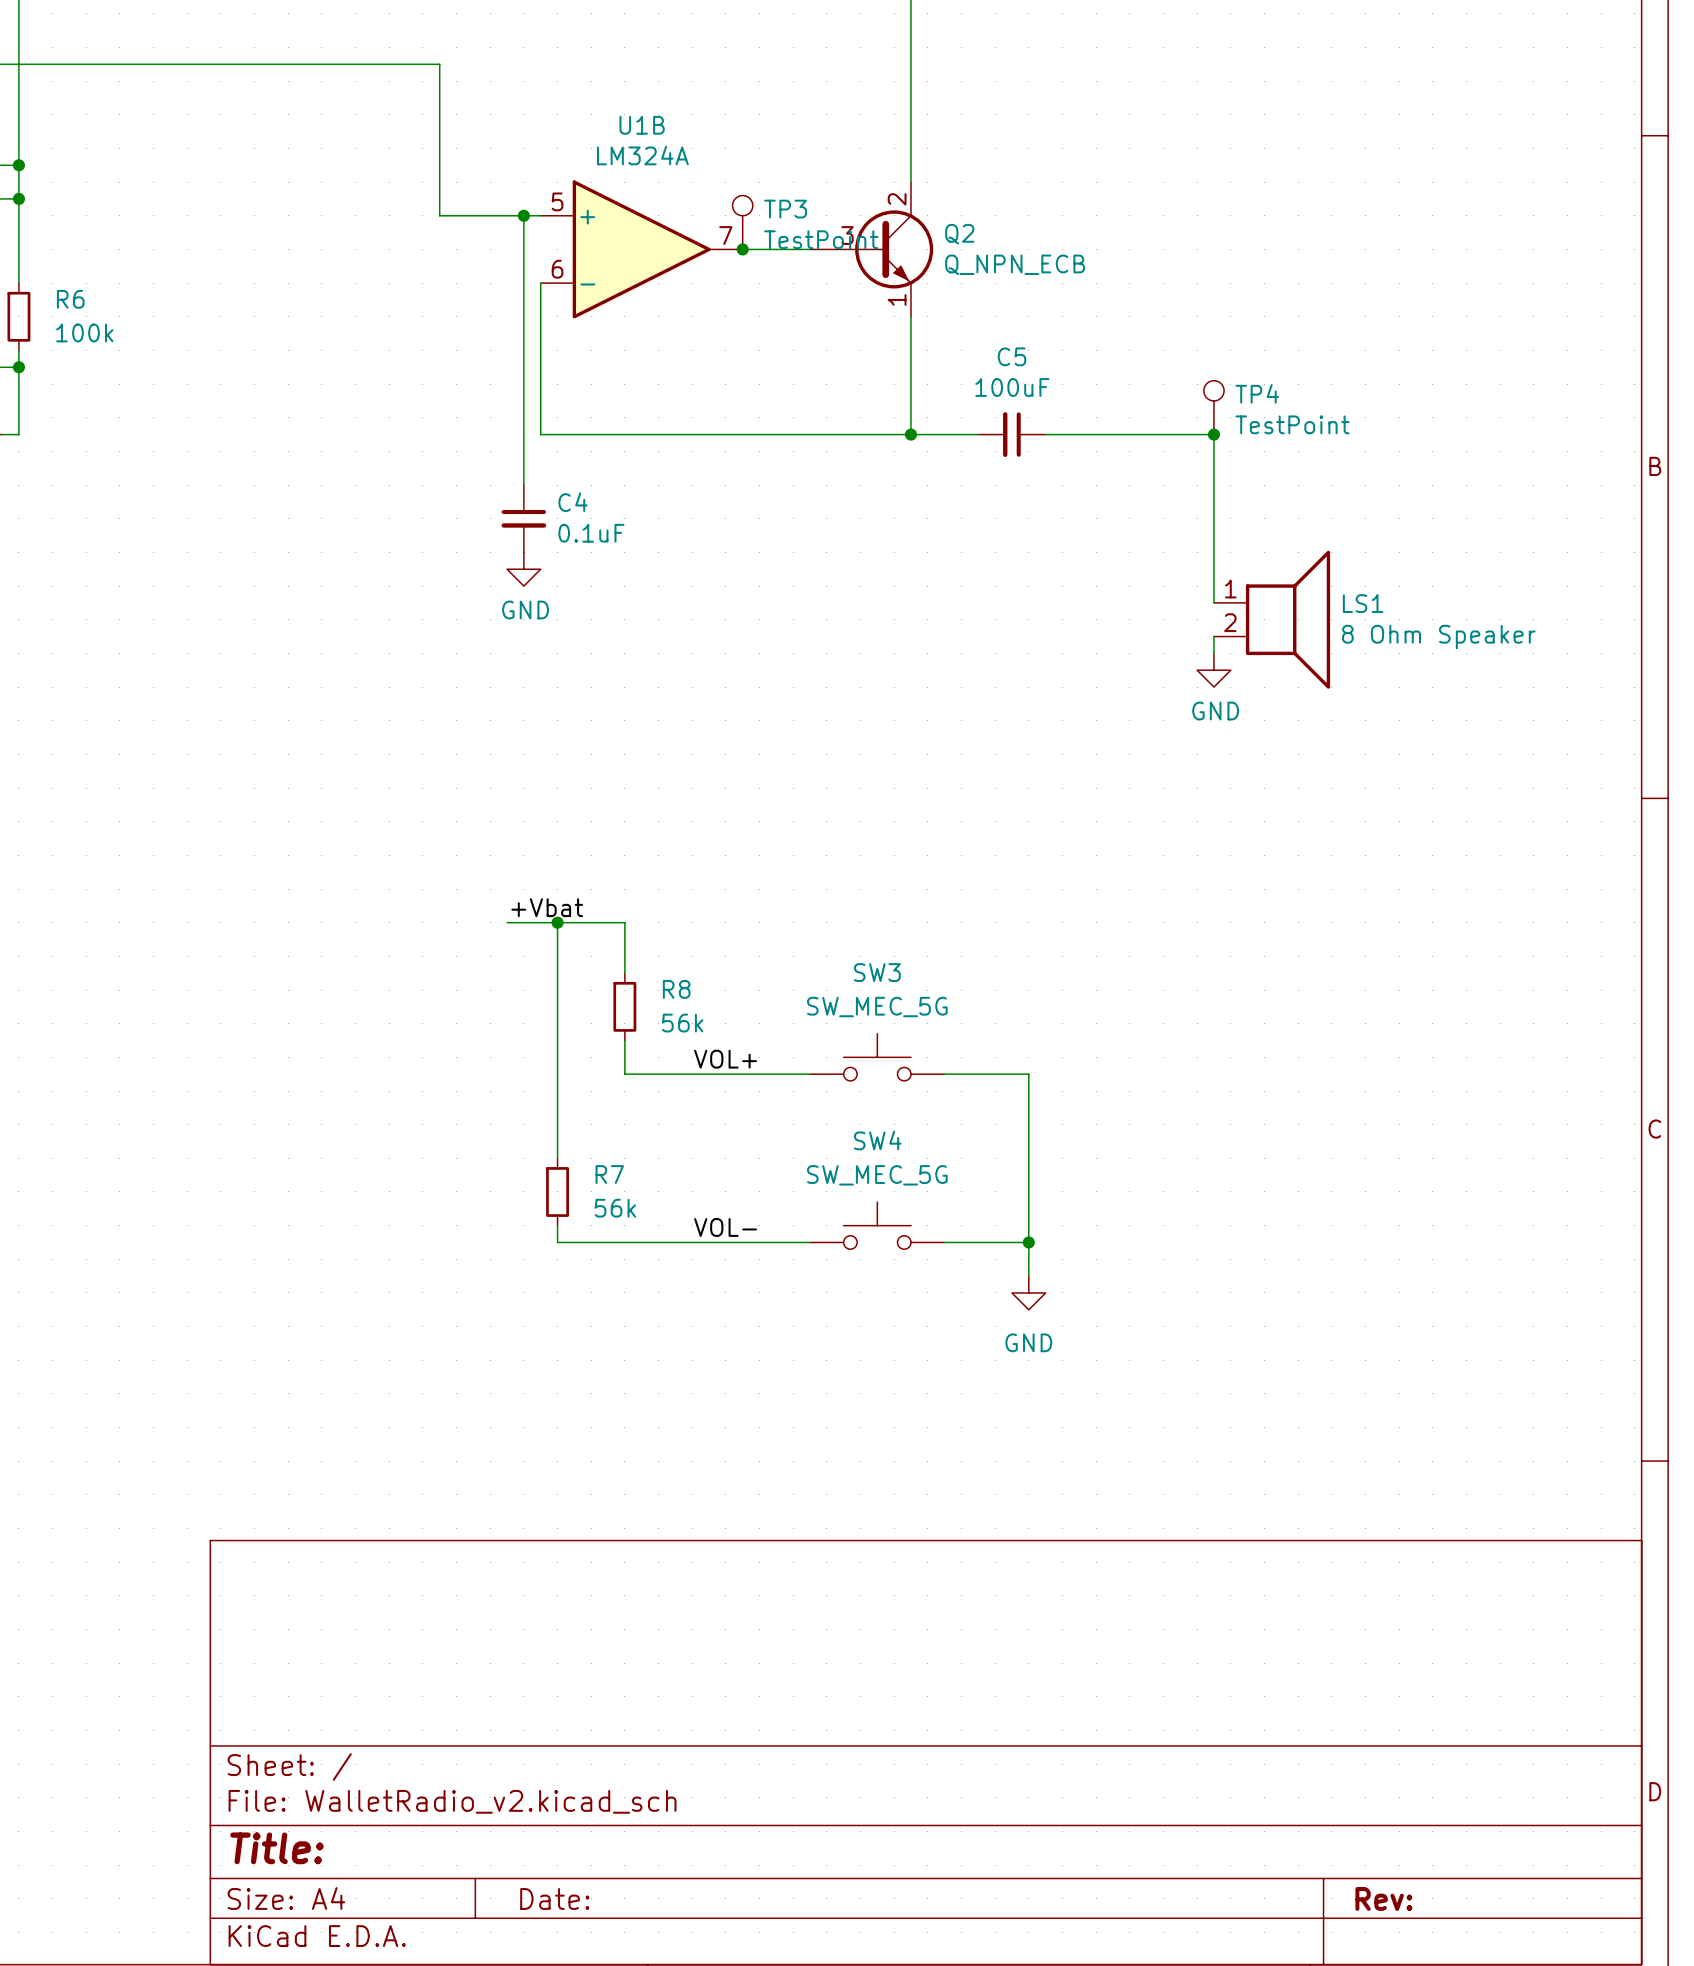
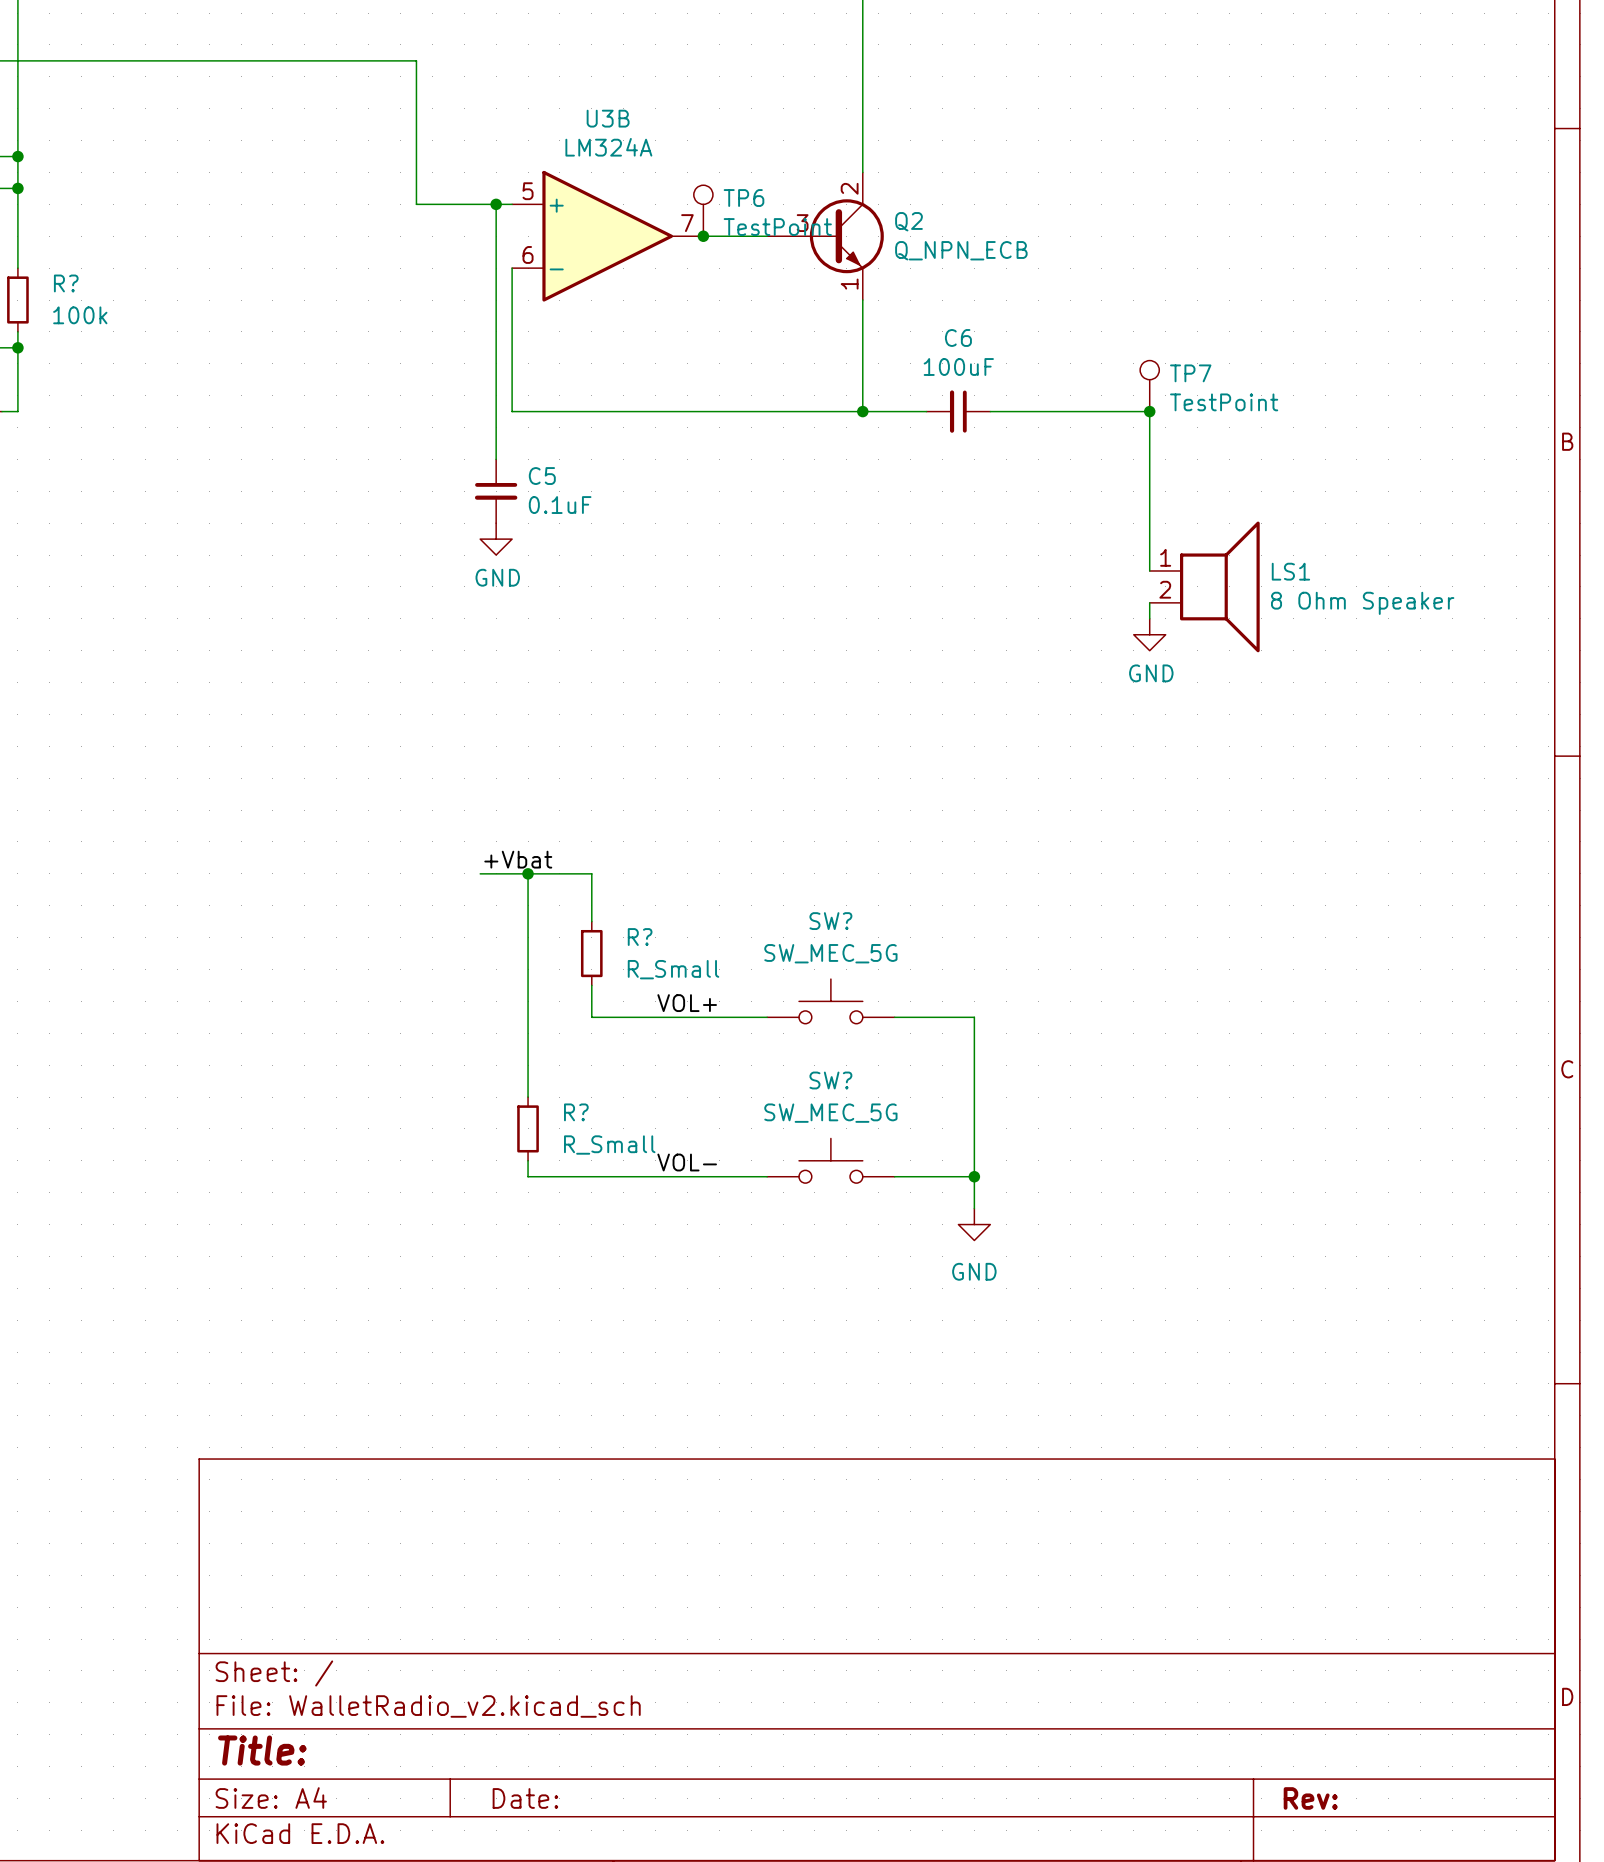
U1B name: U1B (642, 125) -> U3B (608, 118)
TP3 name: TP3 (785, 209) -> TP6 (744, 198)
R6 name: R6 (70, 299) -> R? (66, 283)
C5 name: C5 (1011, 356) -> C6 (958, 337)
TP4 name: TP4 (1257, 393) -> TP7 (1190, 373)
C4 name: C4 (573, 502) -> C5 (542, 476)
SW3 name: SW3 (877, 972) -> SW? (830, 921)
R8 name: R8 (676, 989) -> R? (640, 937)
R8 value: 56k (682, 1023) -> R_Small (673, 969)
SW4 name: SW4 (877, 1140) -> SW? (830, 1080)
R7 name: R7 (609, 1174) -> R? (576, 1112)
R7 value: 56k (615, 1208) -> R_Small (609, 1145)

